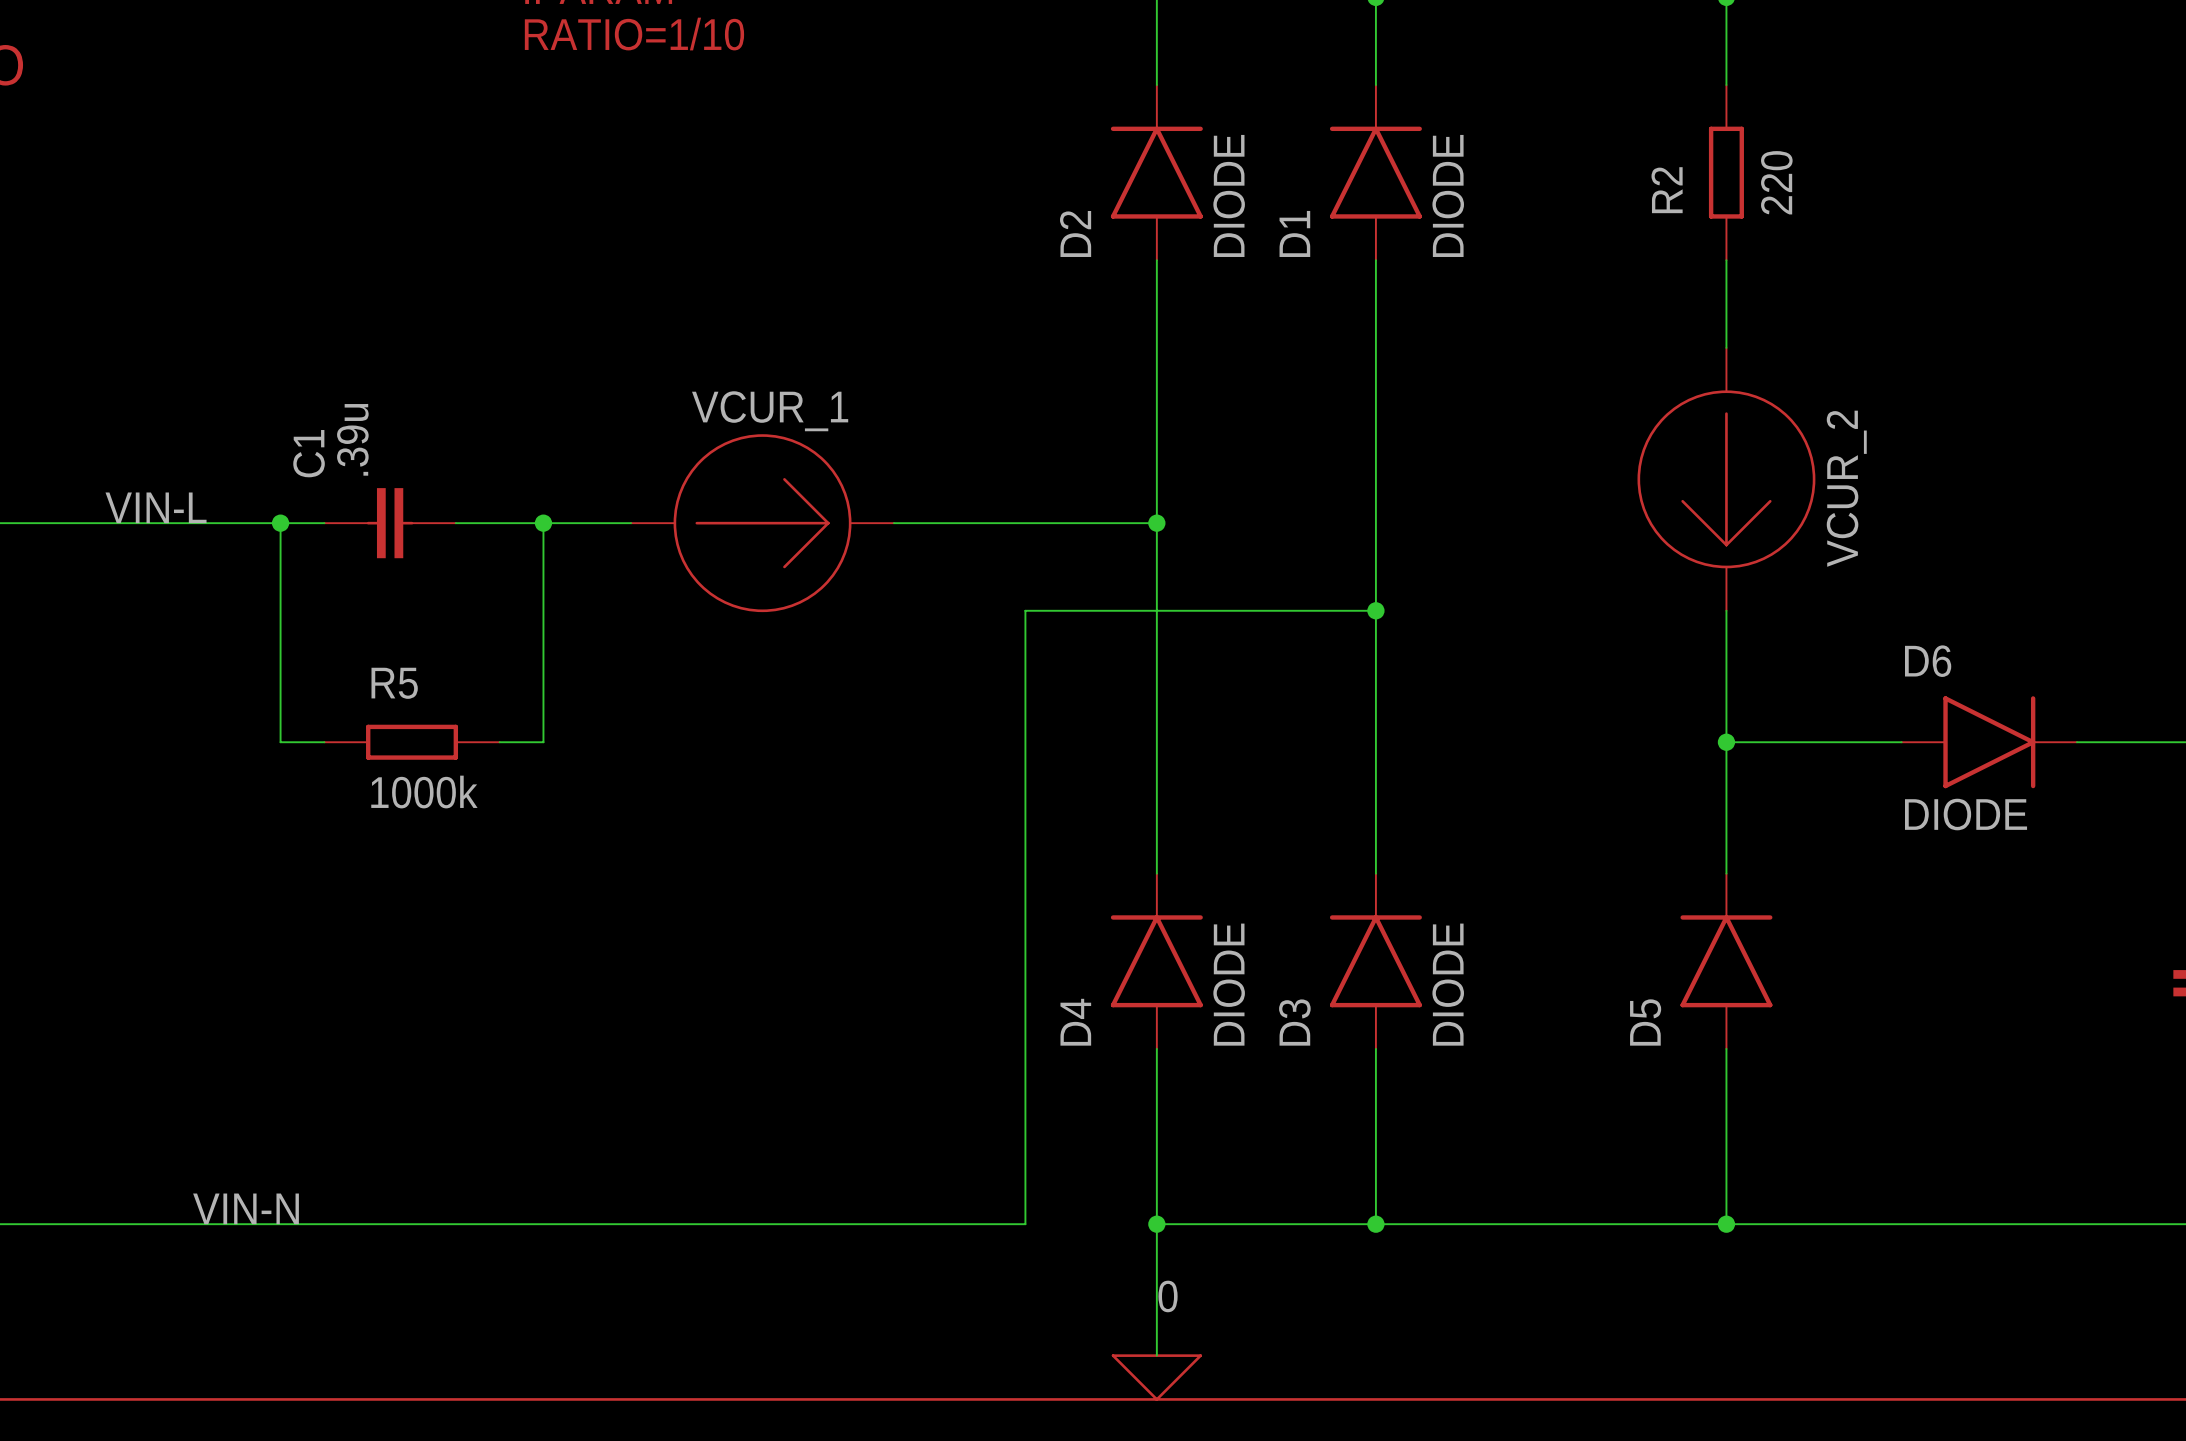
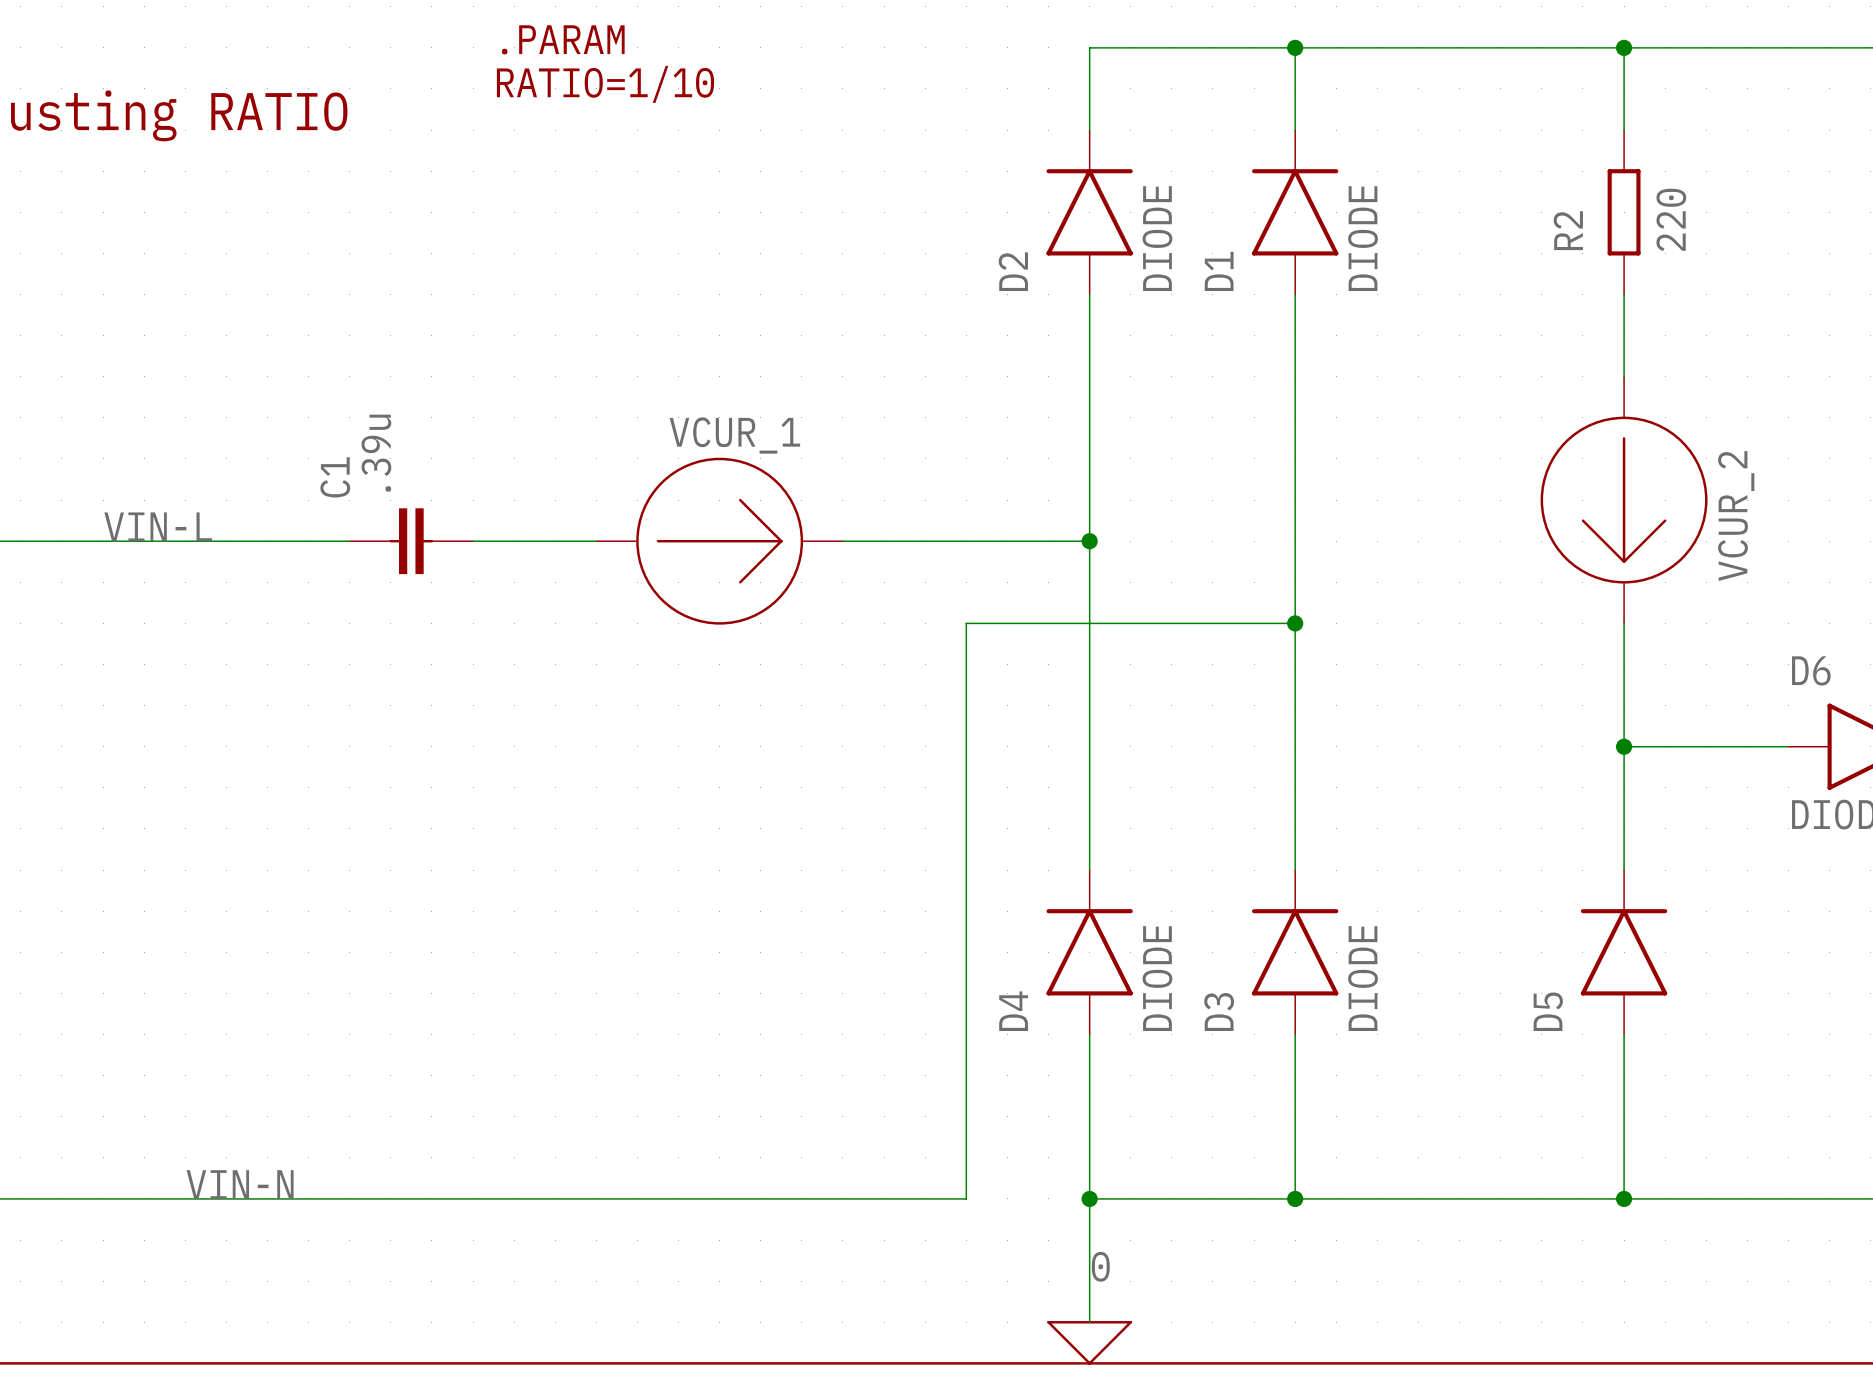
wire: (280, 523) (280, 742) (324, 742) -> none
junction: (280, 523) -> none
C1 position: (390, 523) -> (411, 541)
wire: (543, 523) (543, 742) (499, 742) -> none
junction: (543, 523) -> none
R5: 1000k (412, 742) -> none

